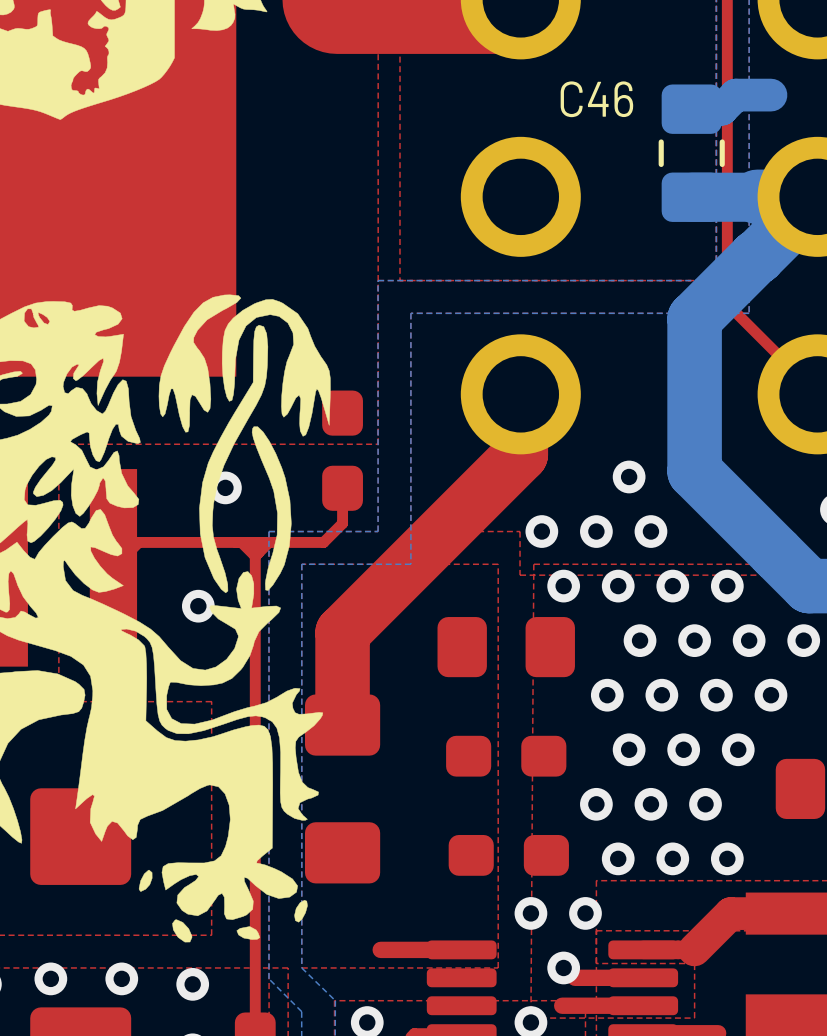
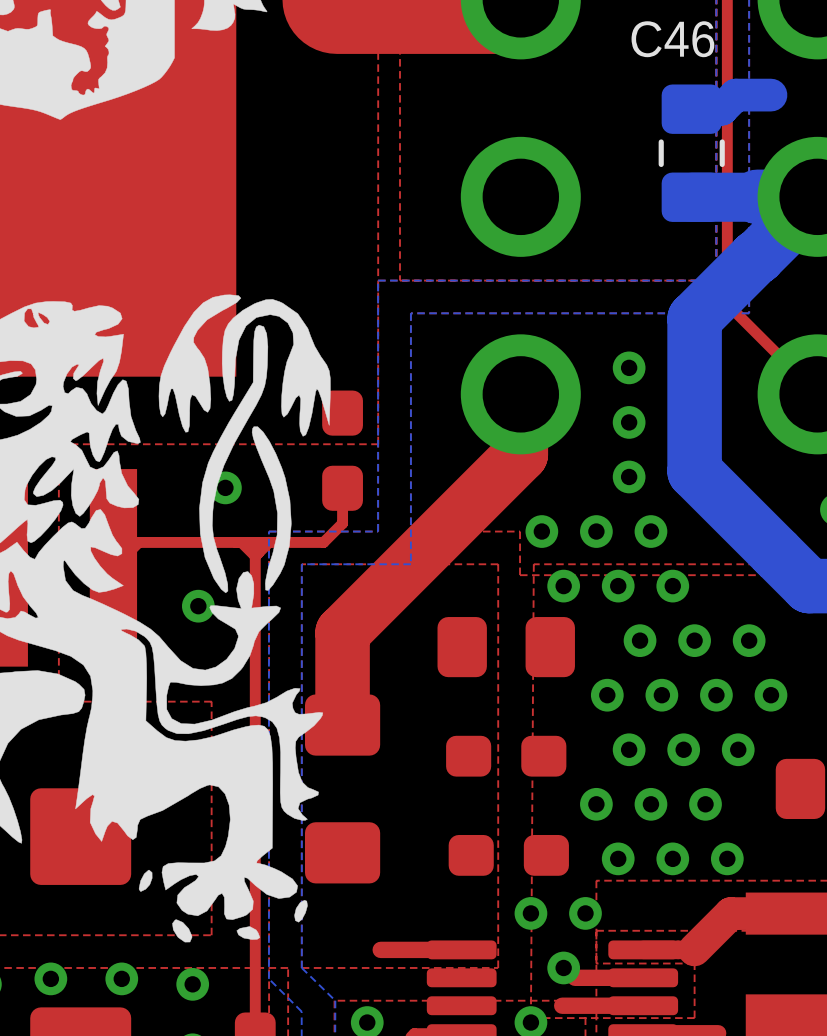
C46 name position: C46 (596, 99) -> C46 (672, 39)
via: none -> (629, 367)
via: none -> (629, 422)
via: (727, 586) -> none
via: (803, 640) -> none

